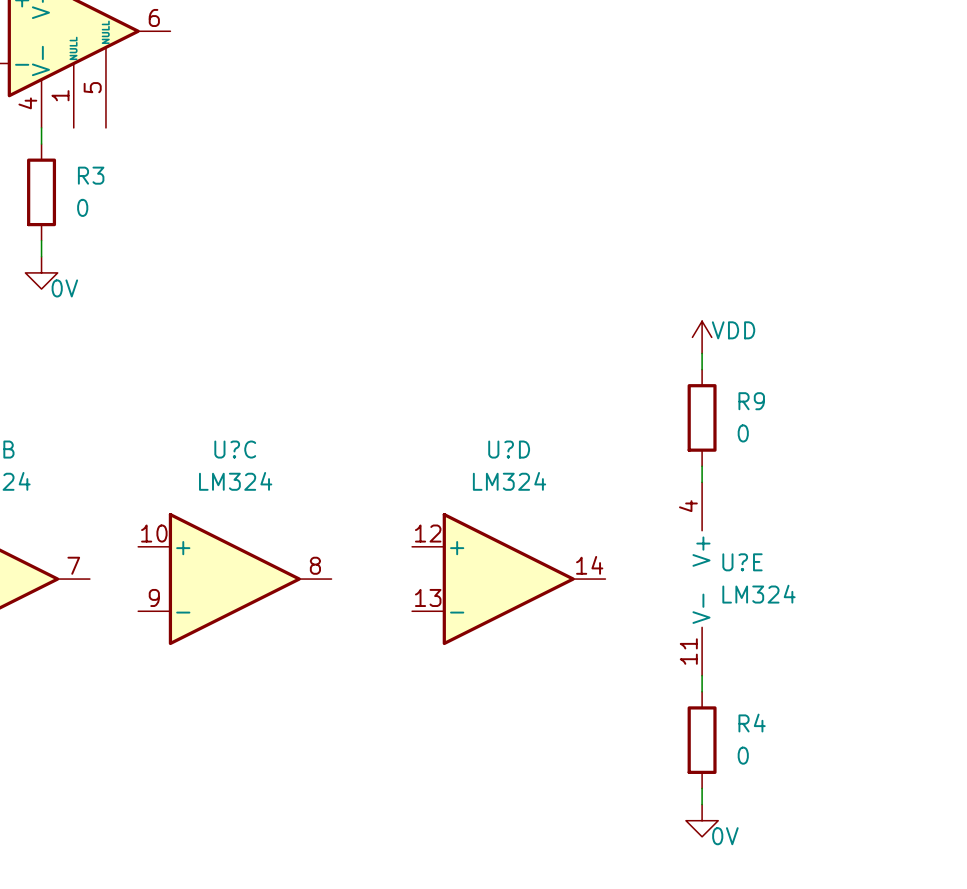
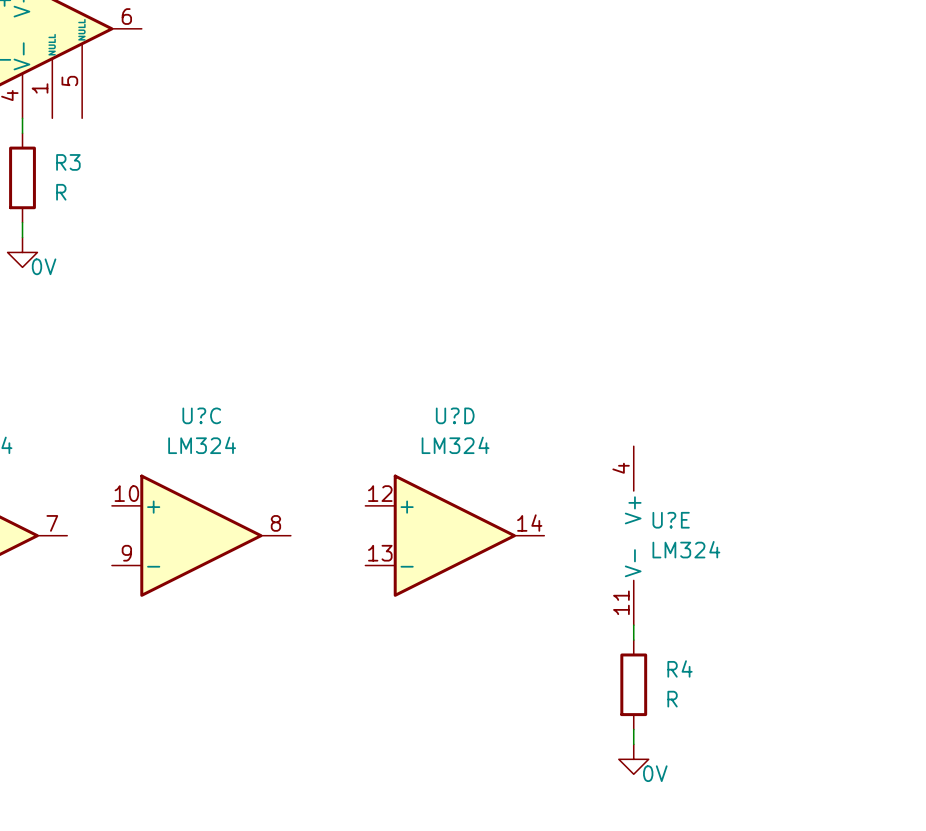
R3 value: 0 (82, 207) -> R (61, 192)
power symbol: VDD (702, 337) -> none
wire: (702, 353) (702, 369) -> none
R9: 0 (702, 417) -> none
wire: (702, 466) (702, 482) -> none
R4 value: 0 (743, 755) -> R (672, 699)

